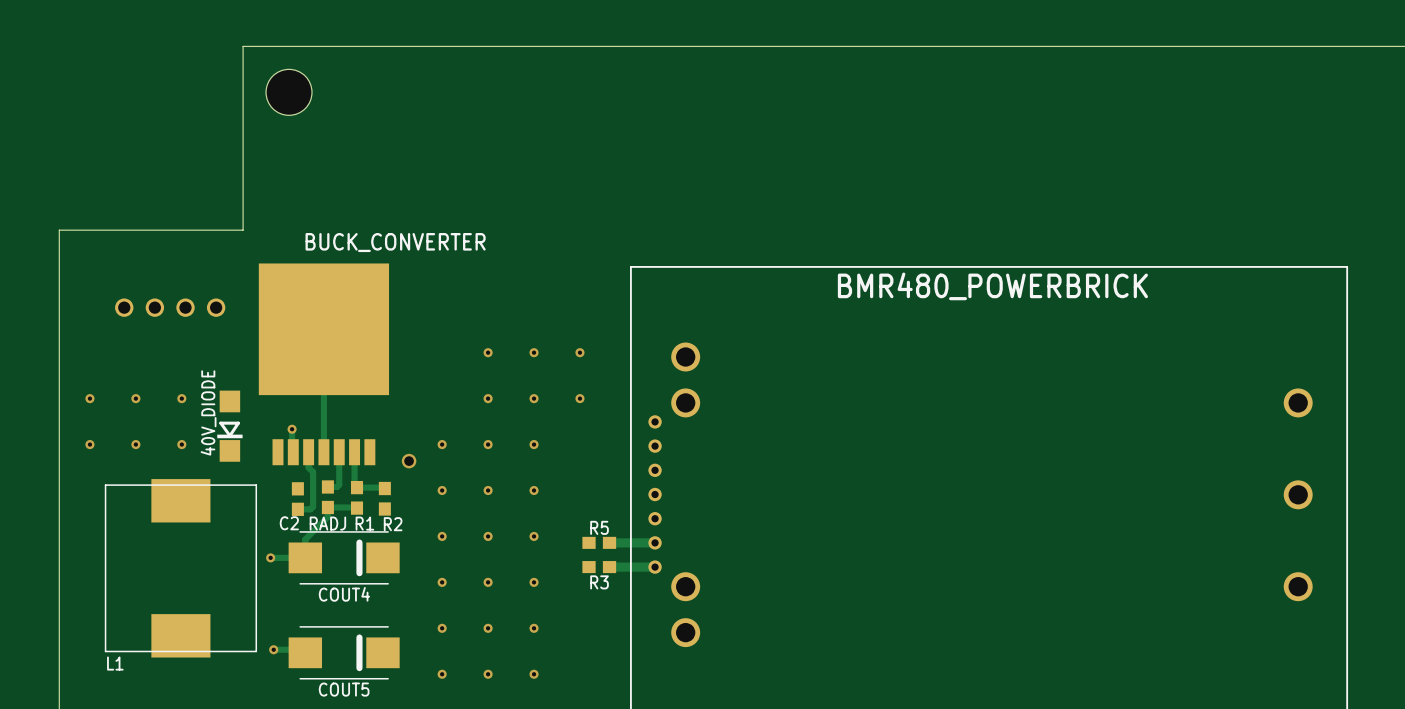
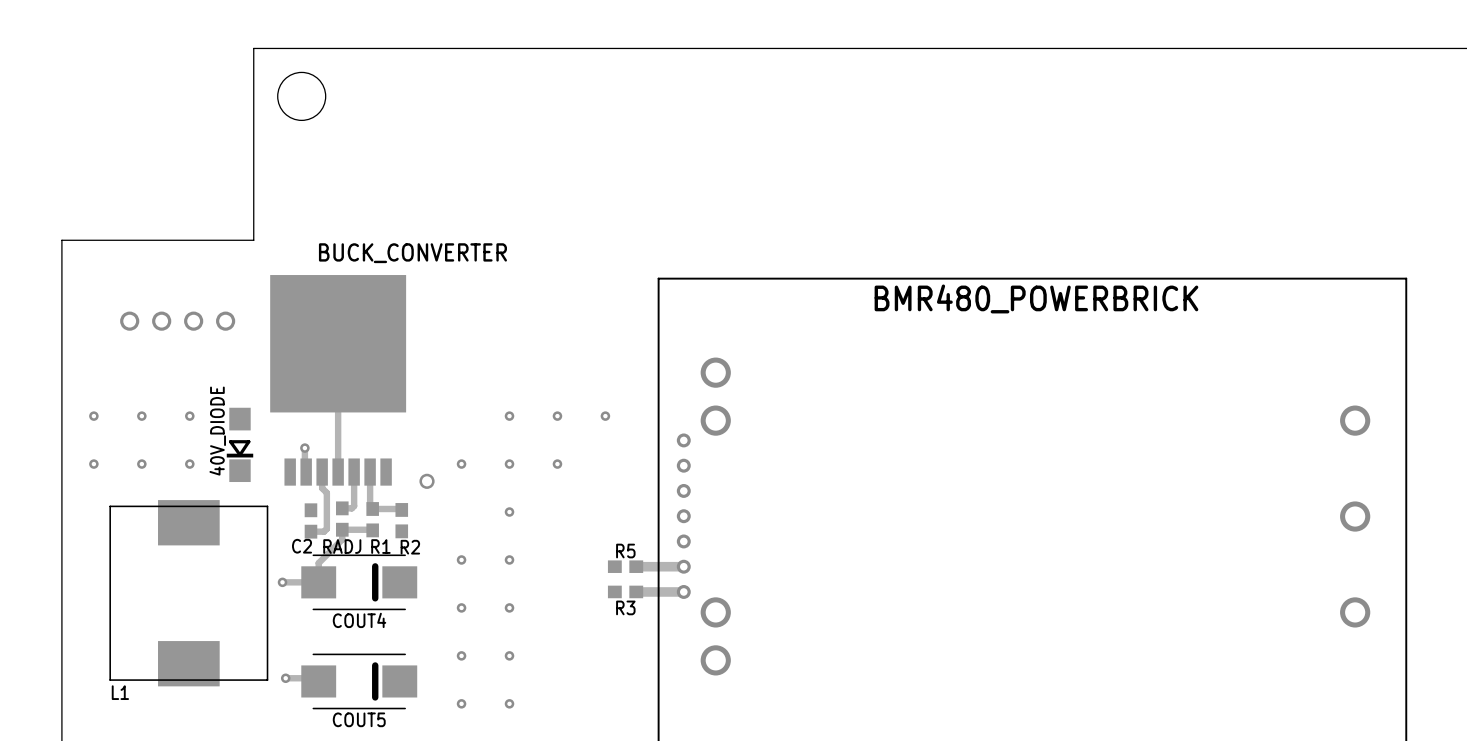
via: (488, 352) -> none
via: (534, 352) -> none
via: (579, 352) -> none
via: (442, 490) -> none
via: (534, 490) -> none
via: (534, 536) -> none
via: (534, 582) -> none
via: (534, 628) -> none
via: (534, 674) -> none

